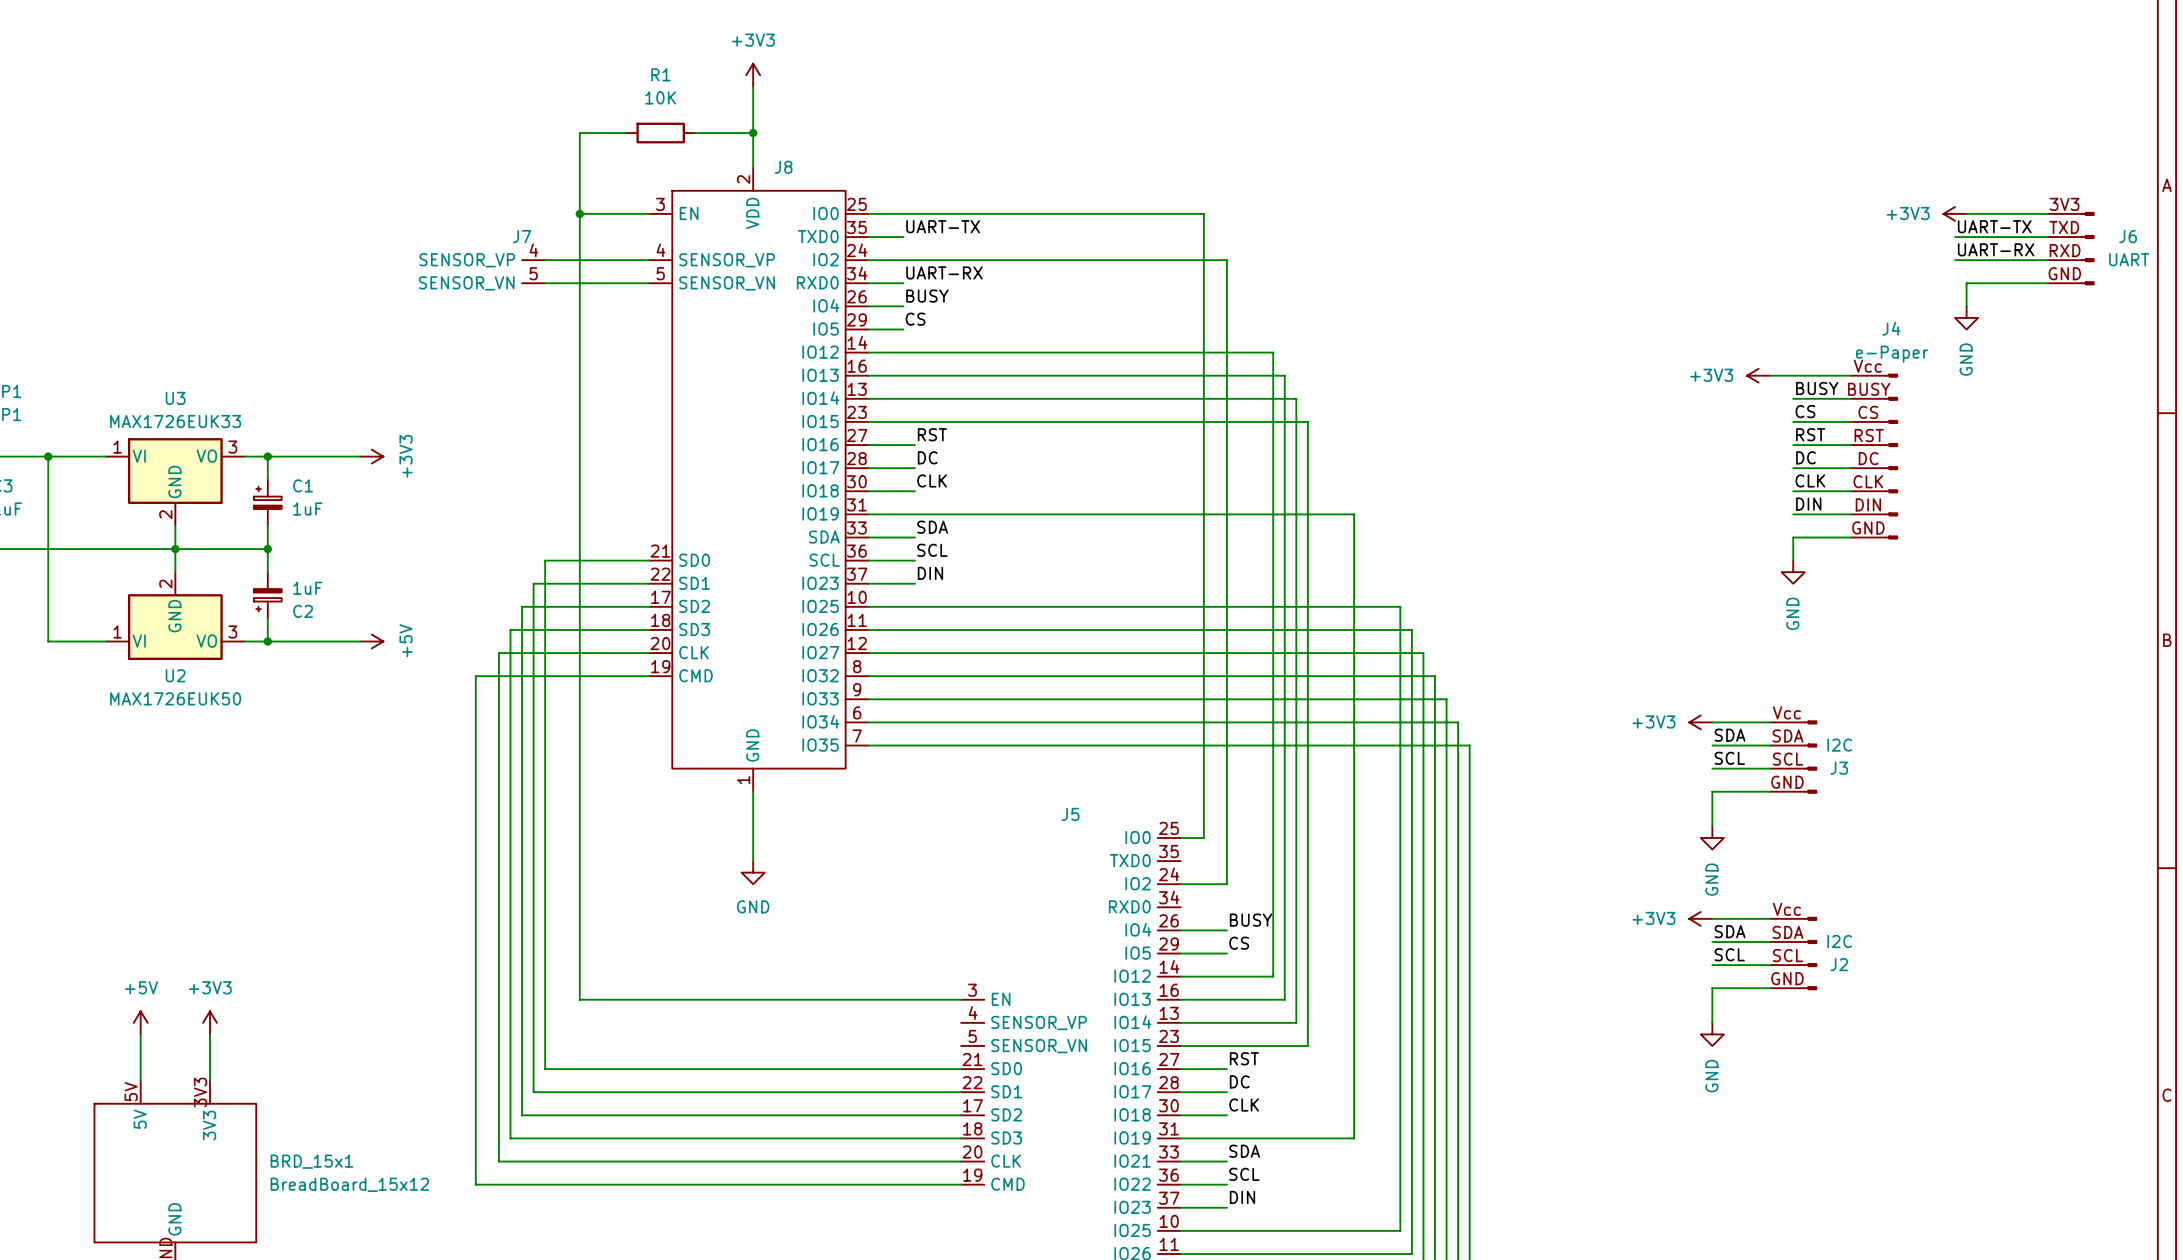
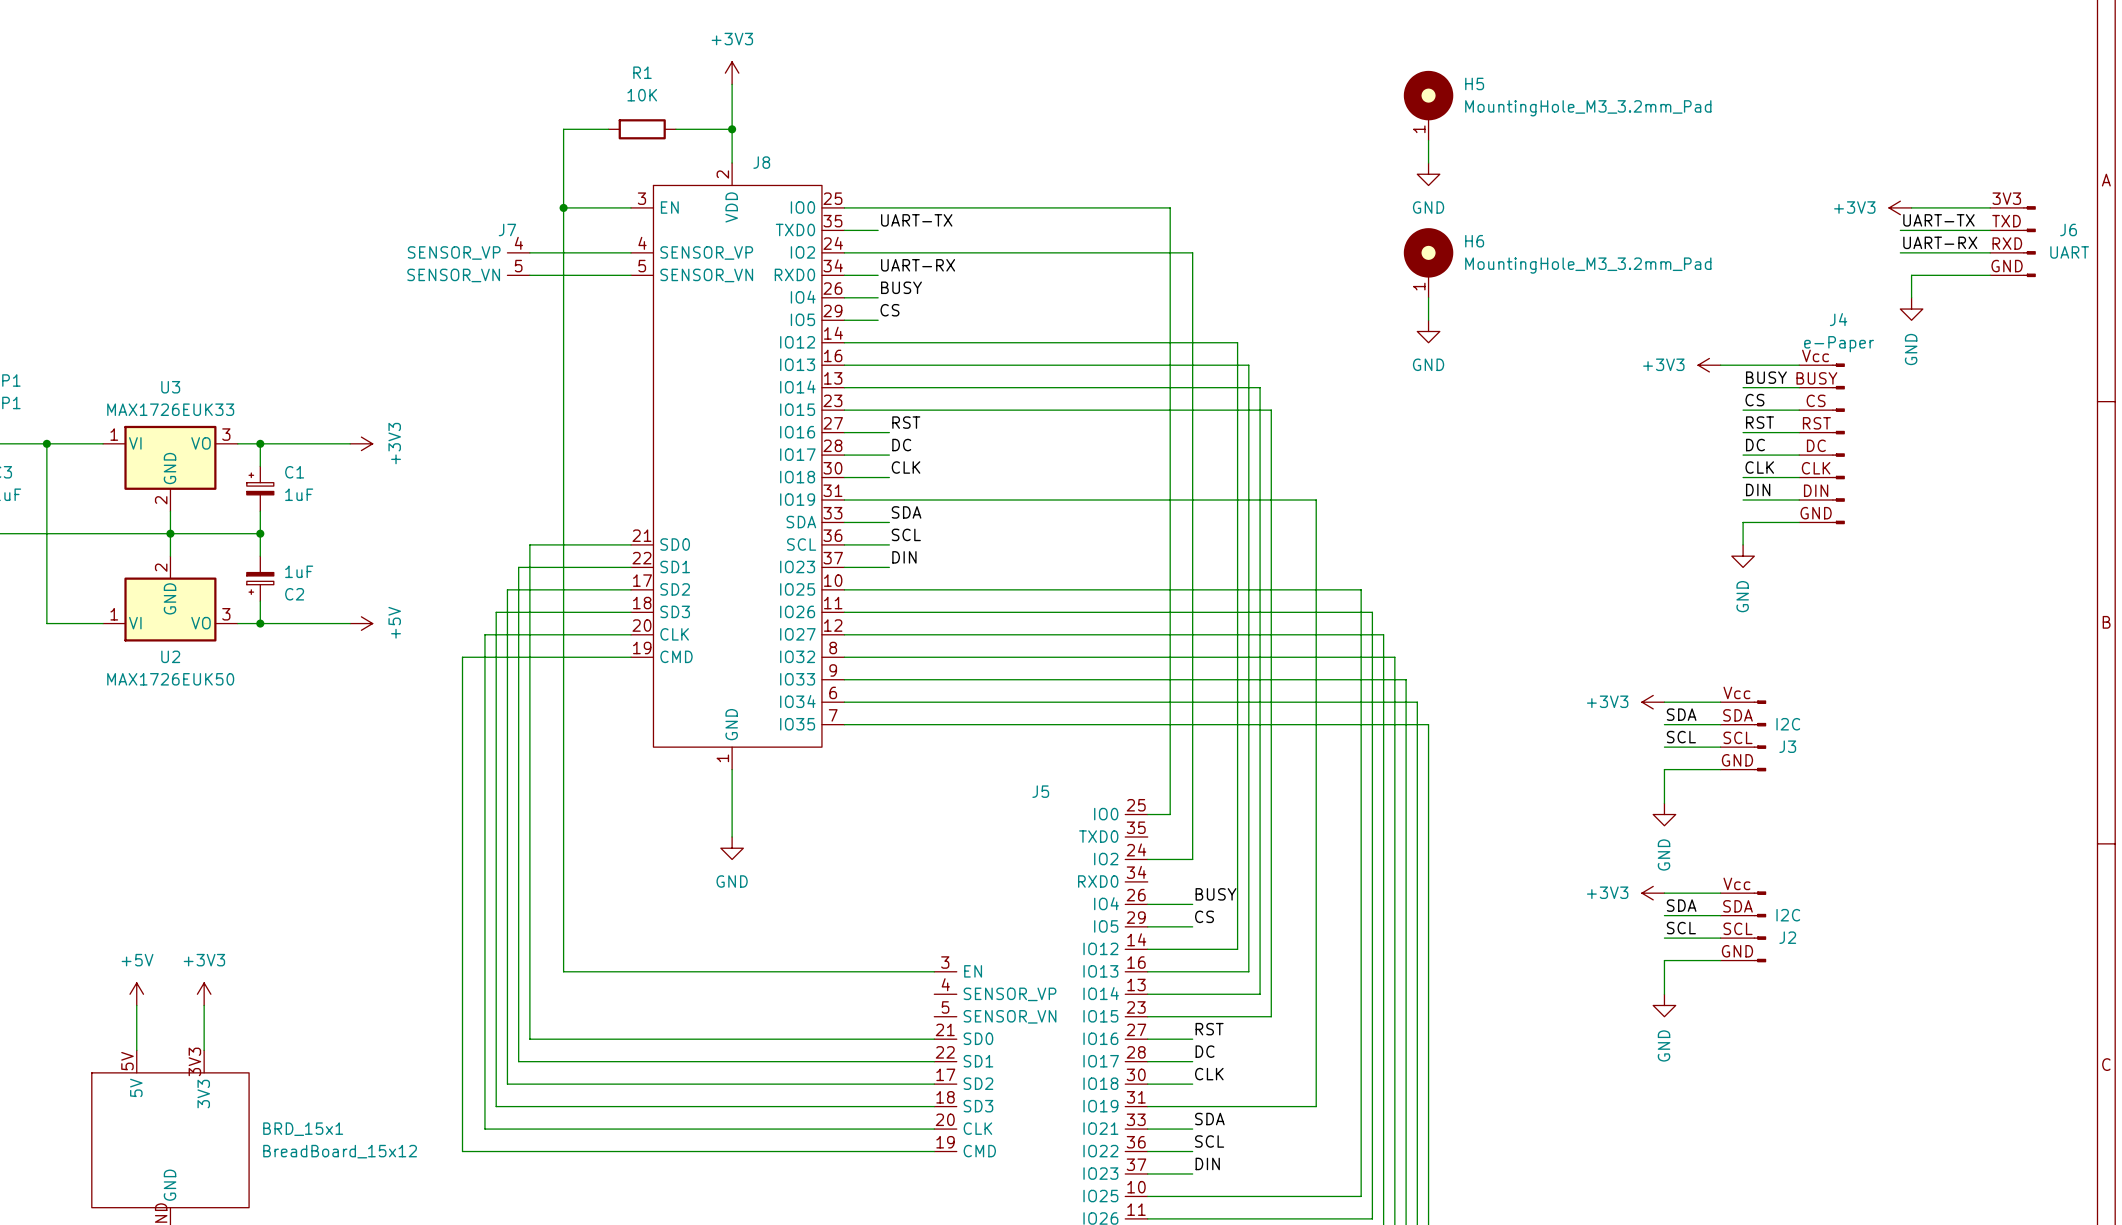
H5: none -> MountingHole_M3_3.2mm_Pad (1428, 105)
wire: none -> (1428, 140) (1428, 163)
power symbol: none -> GND (1428, 174)
H6: none -> MountingHole_M3_3.2mm_Pad (1428, 262)
wire: none -> (1428, 297) (1428, 320)
power symbol: none -> GND (1428, 331)

